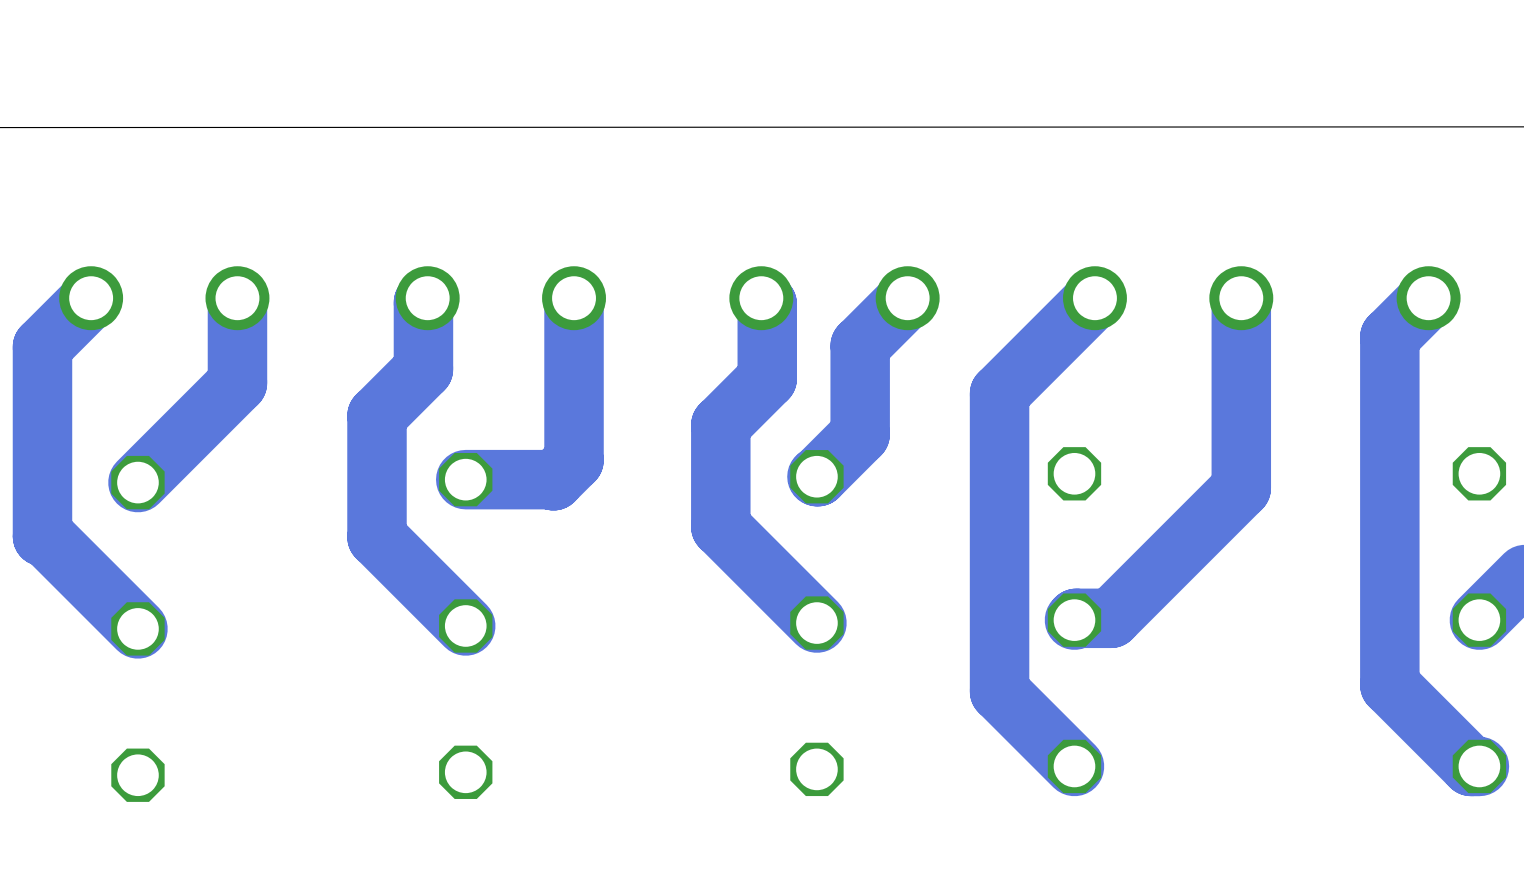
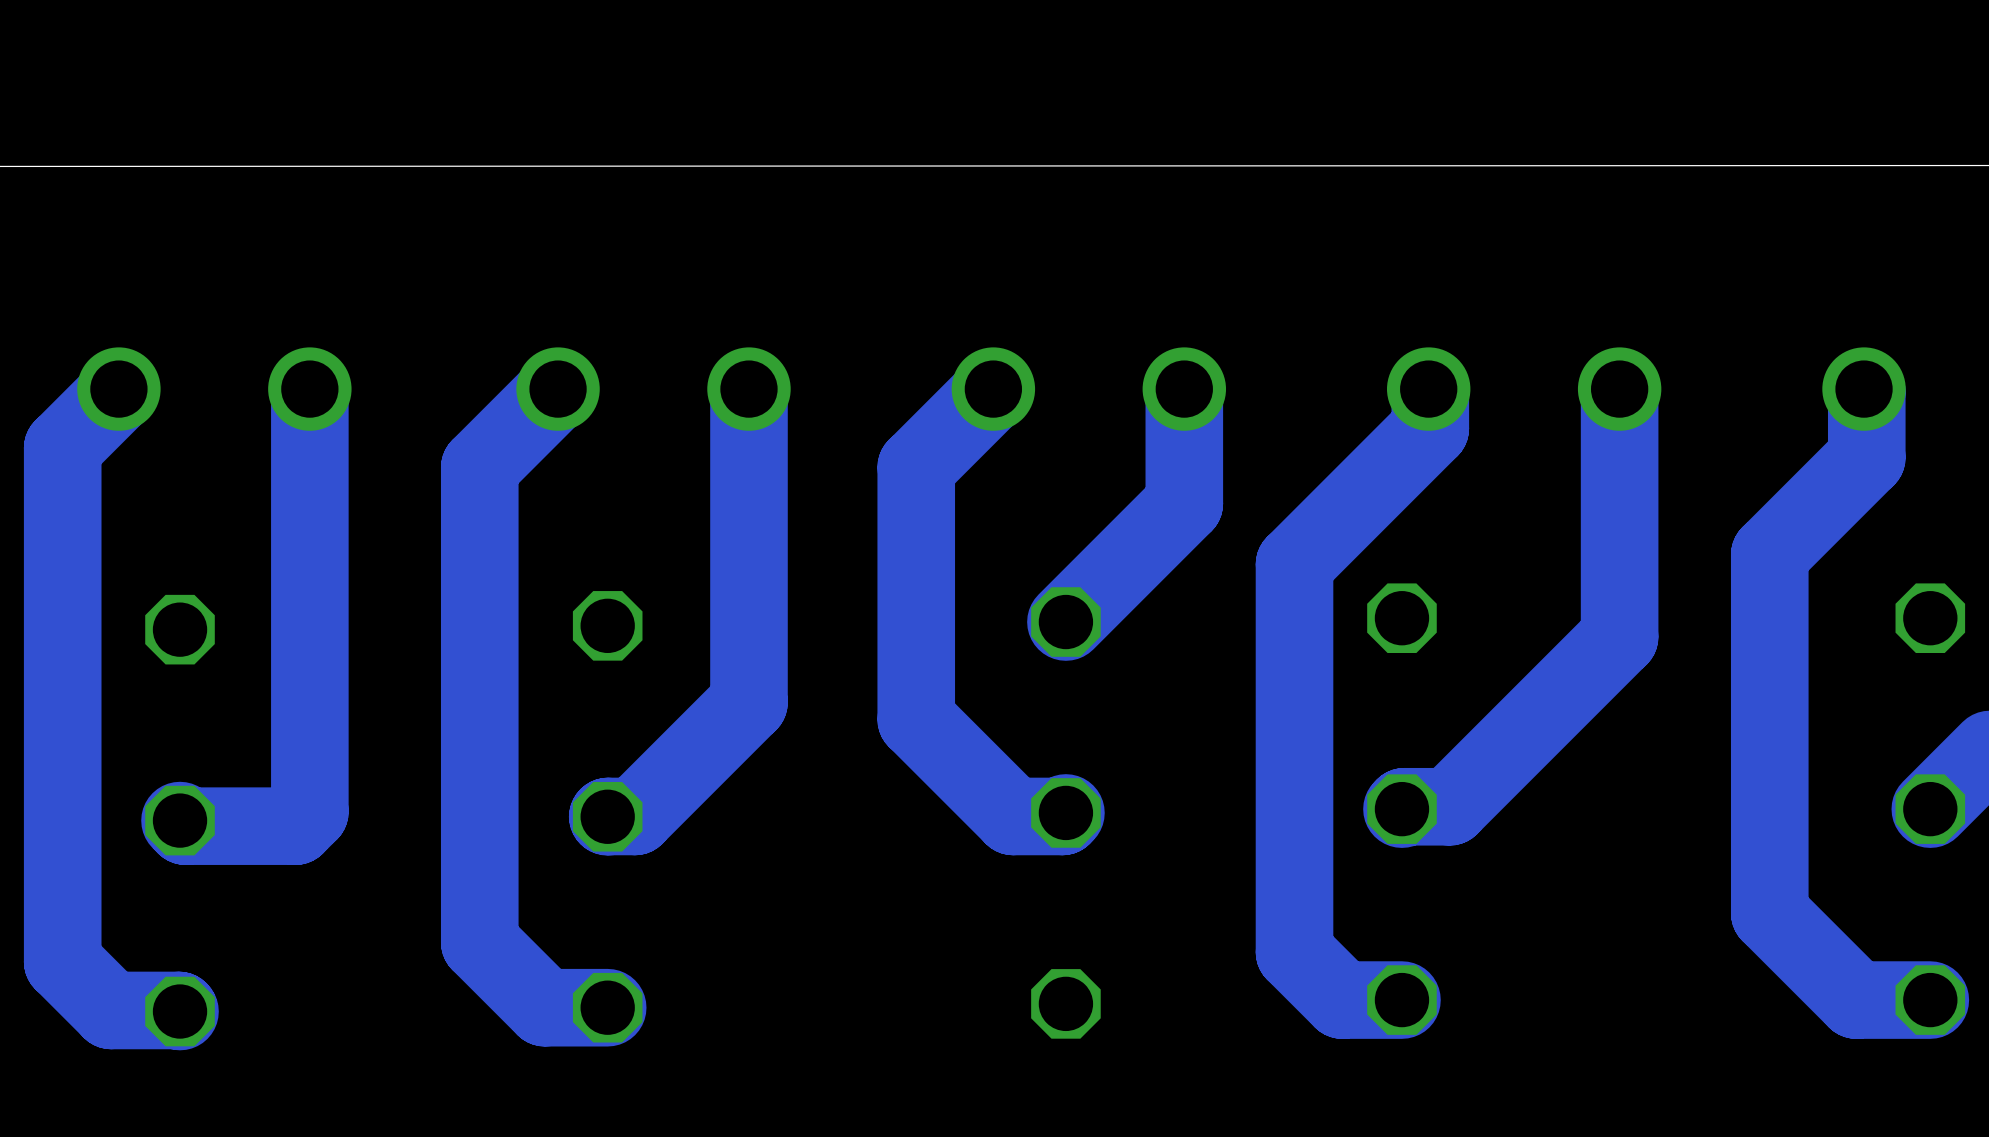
track: (91, 298) (42, 346) (42, 536) (45, 536) (137, 628) -> (118, 389) (117, 392) (62, 447) (62, 961) (111, 1010) (180, 1011)
track: (761, 298) (767, 304) (767, 378) (720, 425) (720, 526) (816, 623) -> (993, 389) (916, 467) (916, 719) (1013, 816) (1062, 816) (1065, 812)
track: (907, 298) (860, 345) (860, 434) (816, 476) -> (1184, 389) (1184, 503) (1065, 622)
track: (1094, 298) (999, 393) (999, 691) (1074, 766) -> (1428, 389) (1430, 390) (1430, 428) (1294, 564) (1294, 952) (1342, 1000) (1401, 1000)
track: (1428, 298) (1389, 336) (1389, 685) (1471, 766) -> (1864, 389) (1866, 391) (1866, 457) (1769, 554) (1769, 913) (1856, 1000) (1919, 1000)
track: (423, 302) (423, 369) (376, 415) (376, 537) (465, 625) -> (552, 394) (479, 467) (479, 942) (544, 1007) (607, 1007)
track: (237, 383) (137, 482) -> (309, 499) (309, 811) (295, 826) (185, 826) (180, 820)
track: (574, 460) (553, 480) (465, 479) -> (748, 600) (748, 702) (634, 816) (608, 816)

